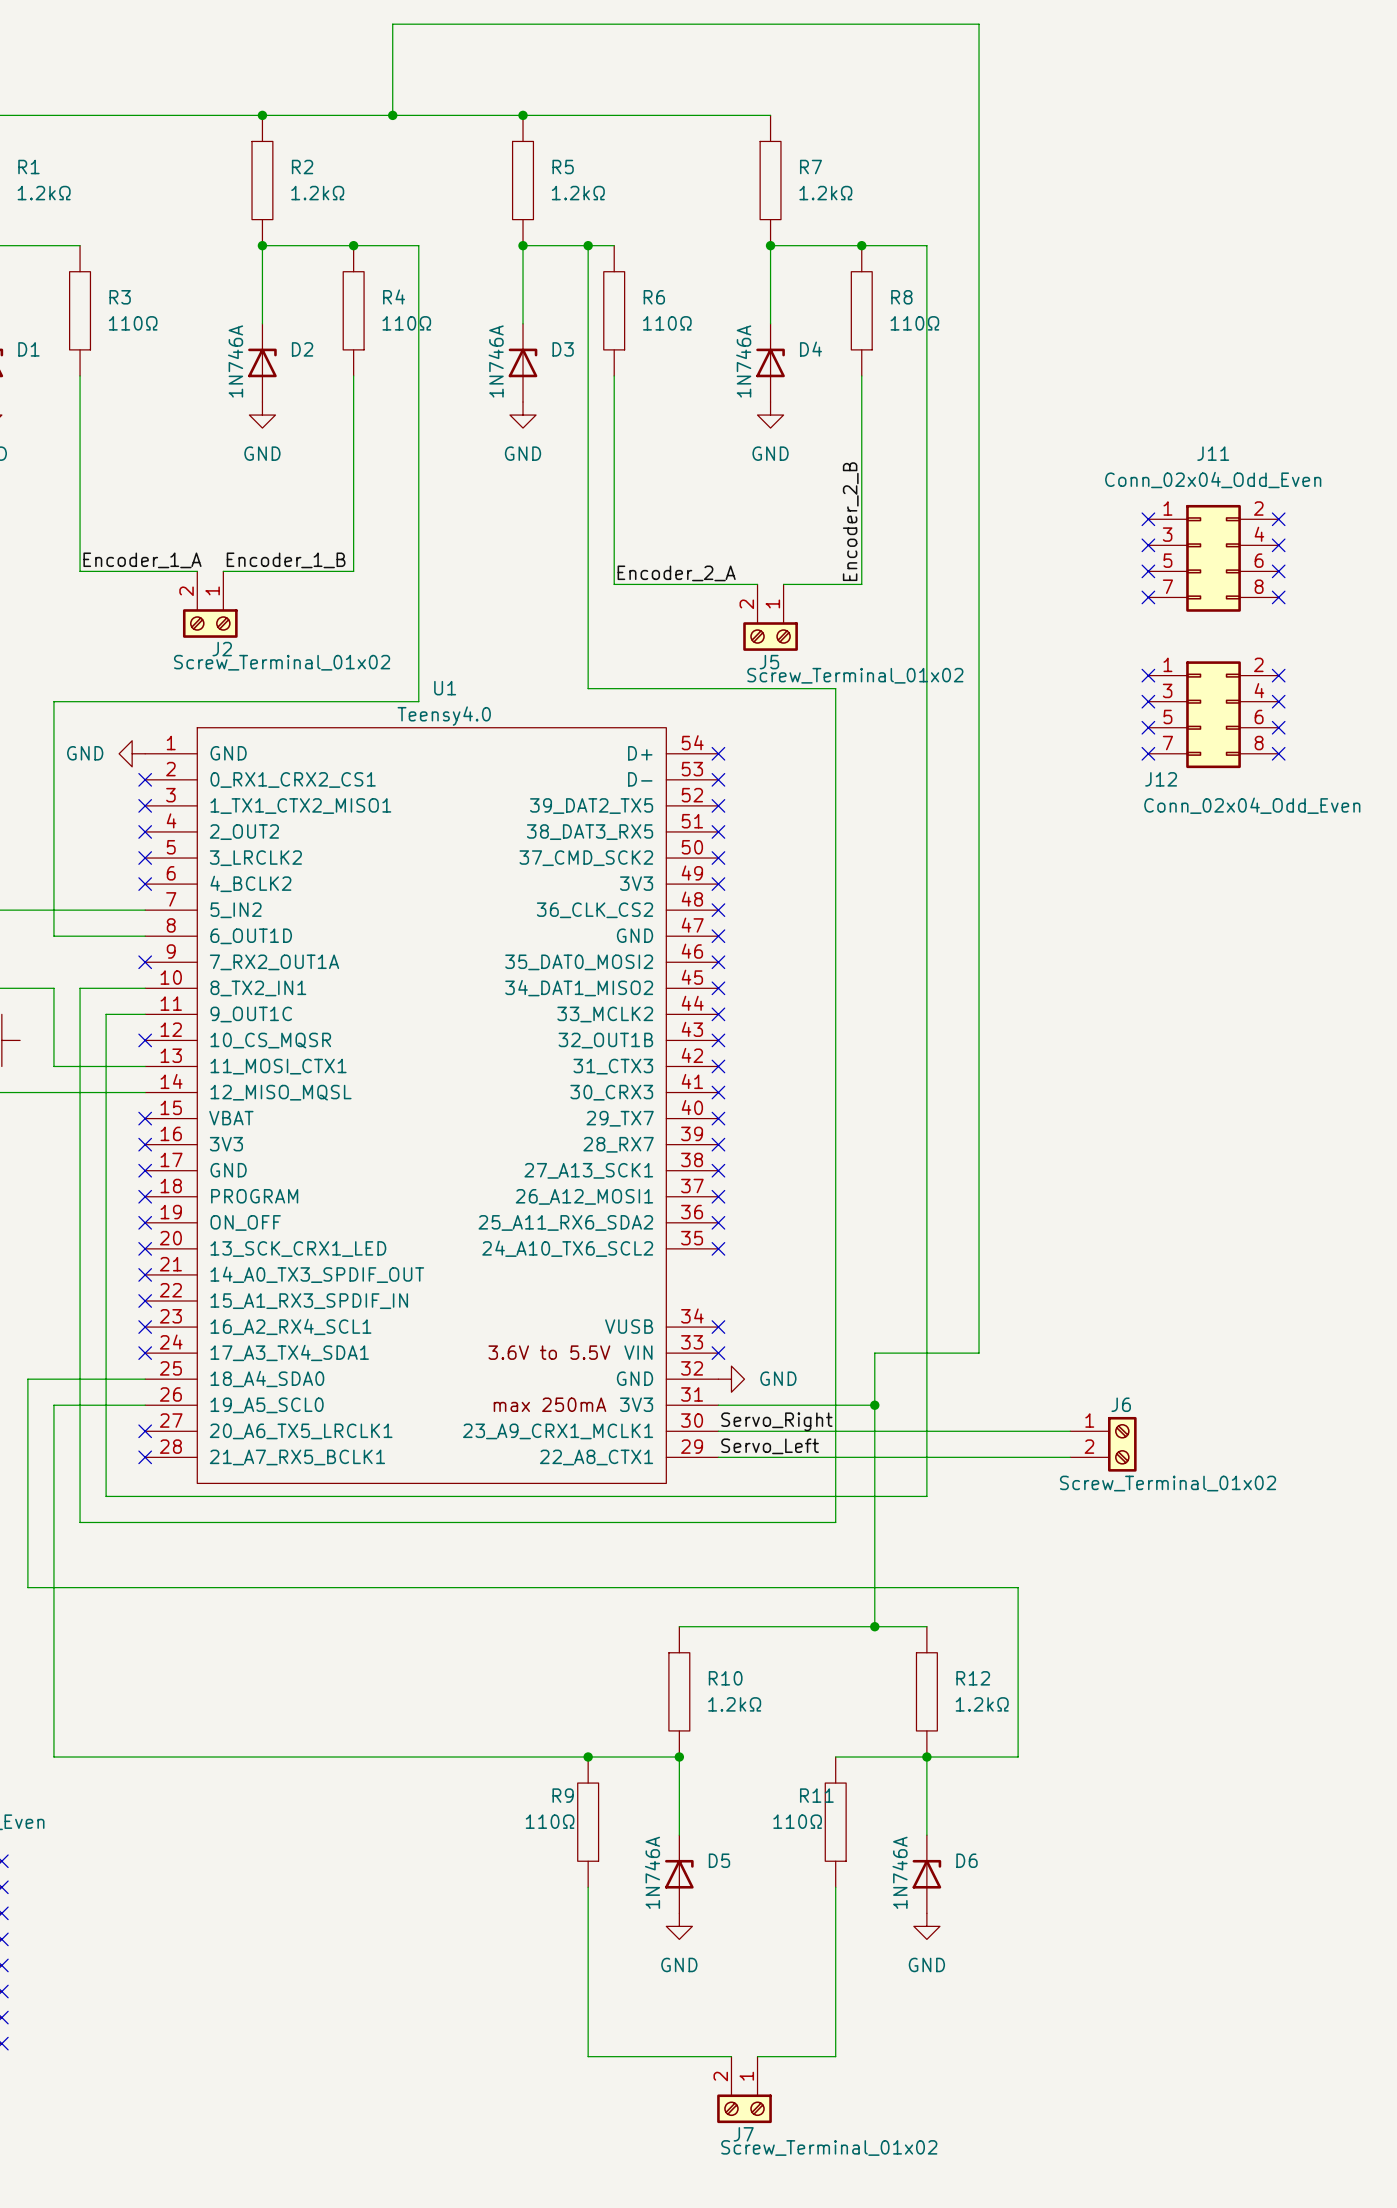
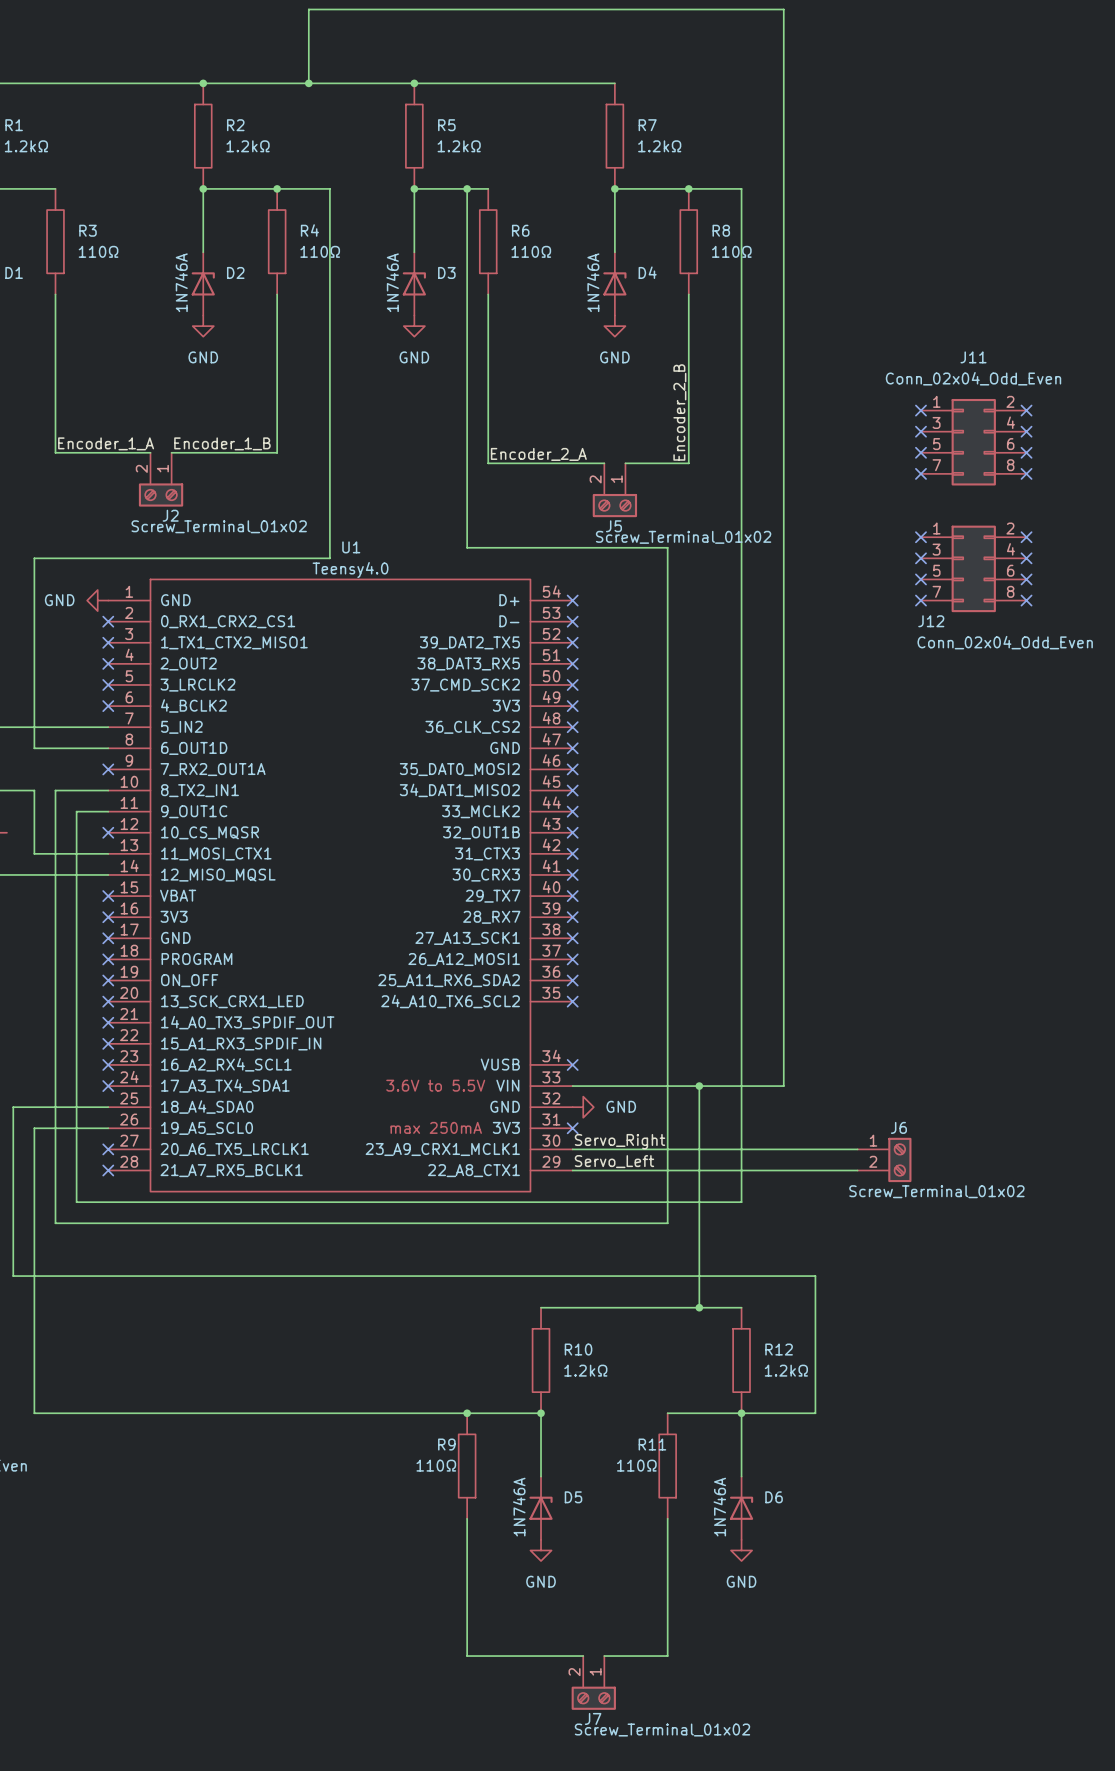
no-connect mark position: (718, 1353) -> (572, 1128)
wire: (718, 1405) (874, 1405) -> (572, 1086) (699, 1086)
junction position: (874, 1405) -> (699, 1086)

